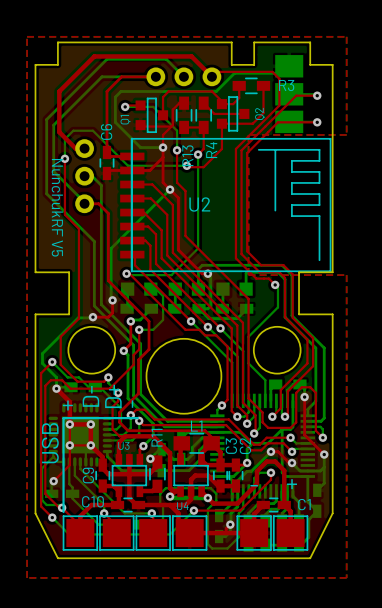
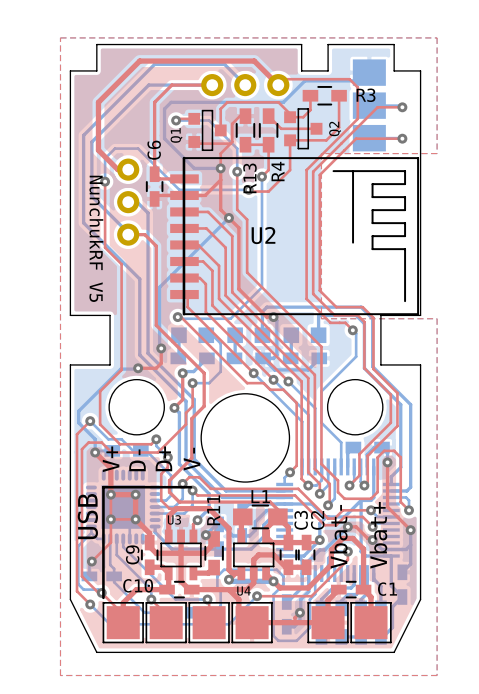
part value: none -> V- (192, 459)
part value: none -> D- (137, 460)
part value: none -> D+ (163, 458)
part value: none -> V+ (111, 459)
text: D- (90, 396) -> none
text: D+ (113, 396) -> none
text: - (132, 404) -> none
text: + (67, 405) -> none
part value: none -> Vbat- (338, 536)
part value: none -> Vbat+ (378, 535)
text: + (292, 484) -> none
text: - (254, 485) -> none

